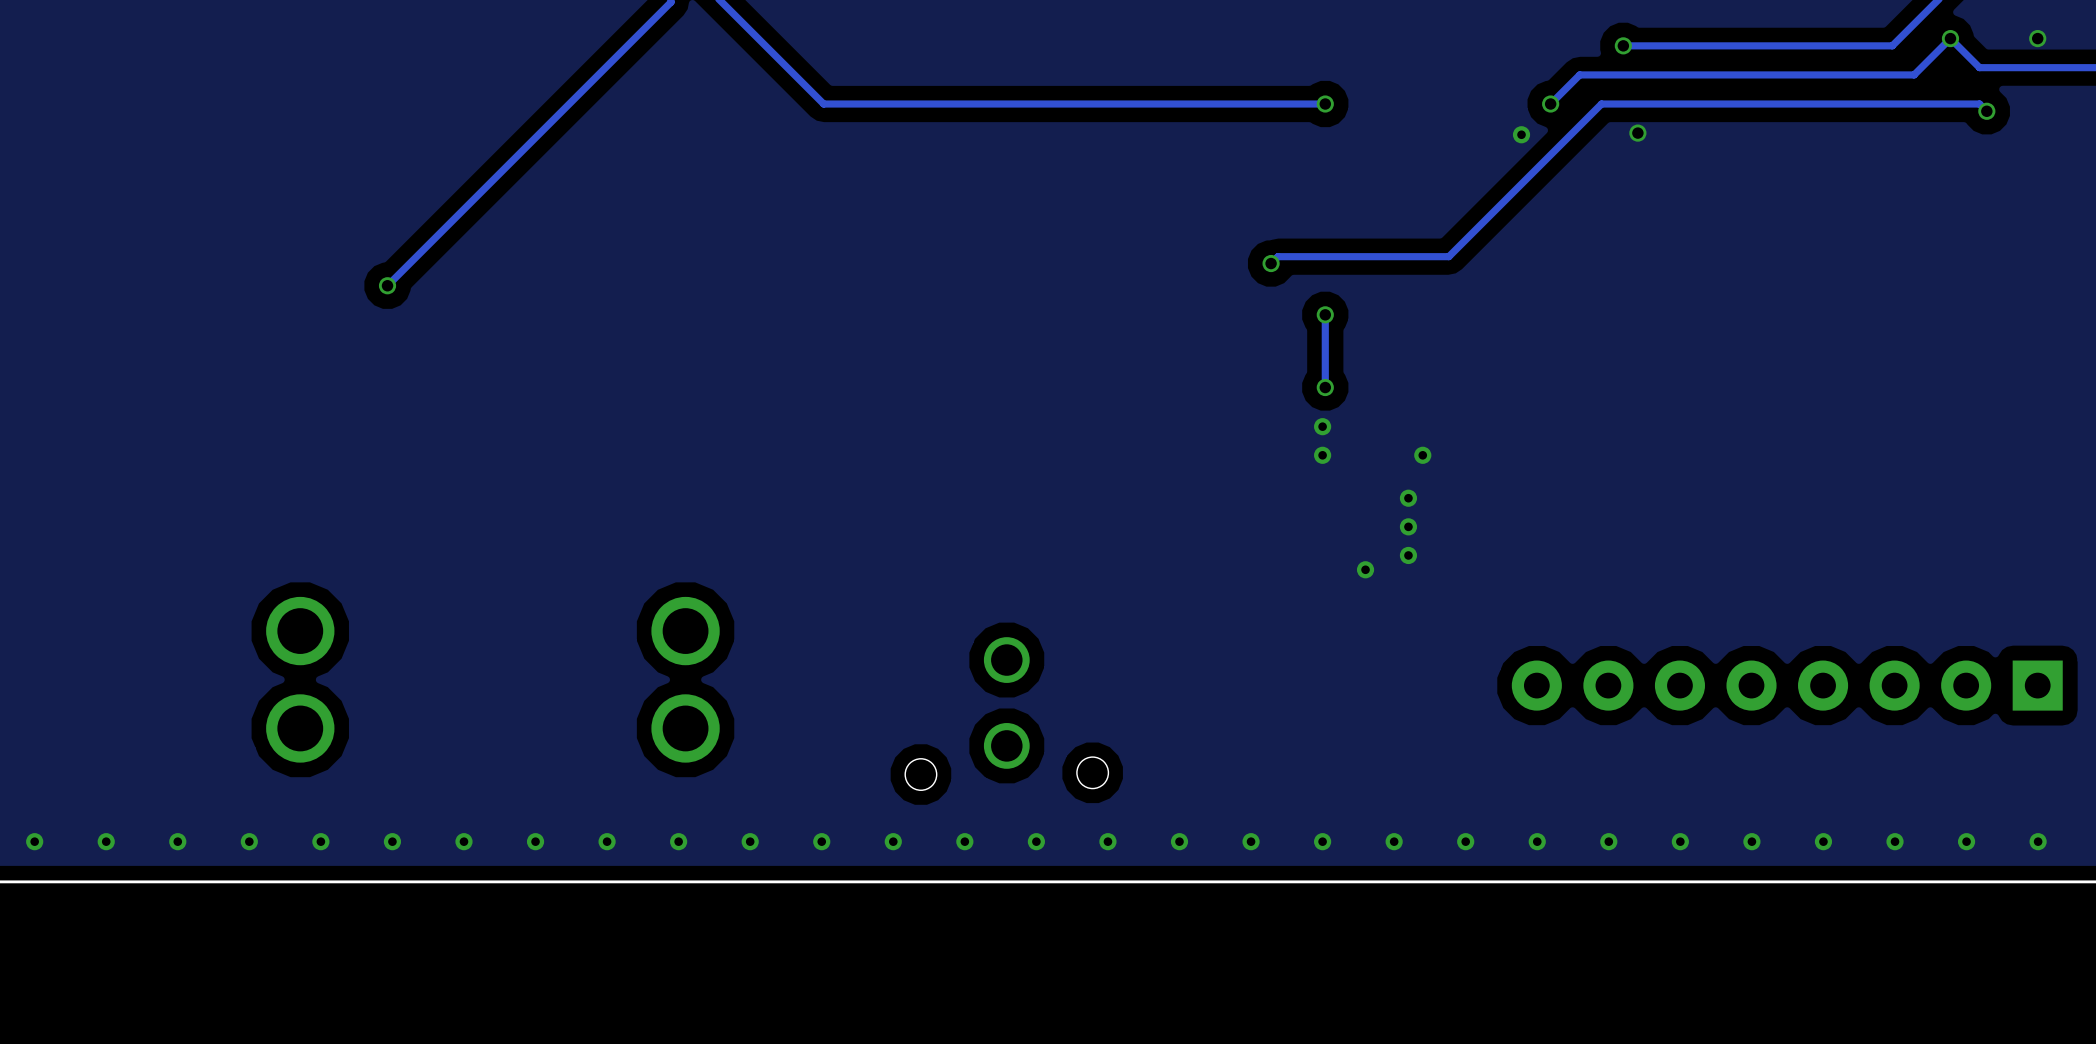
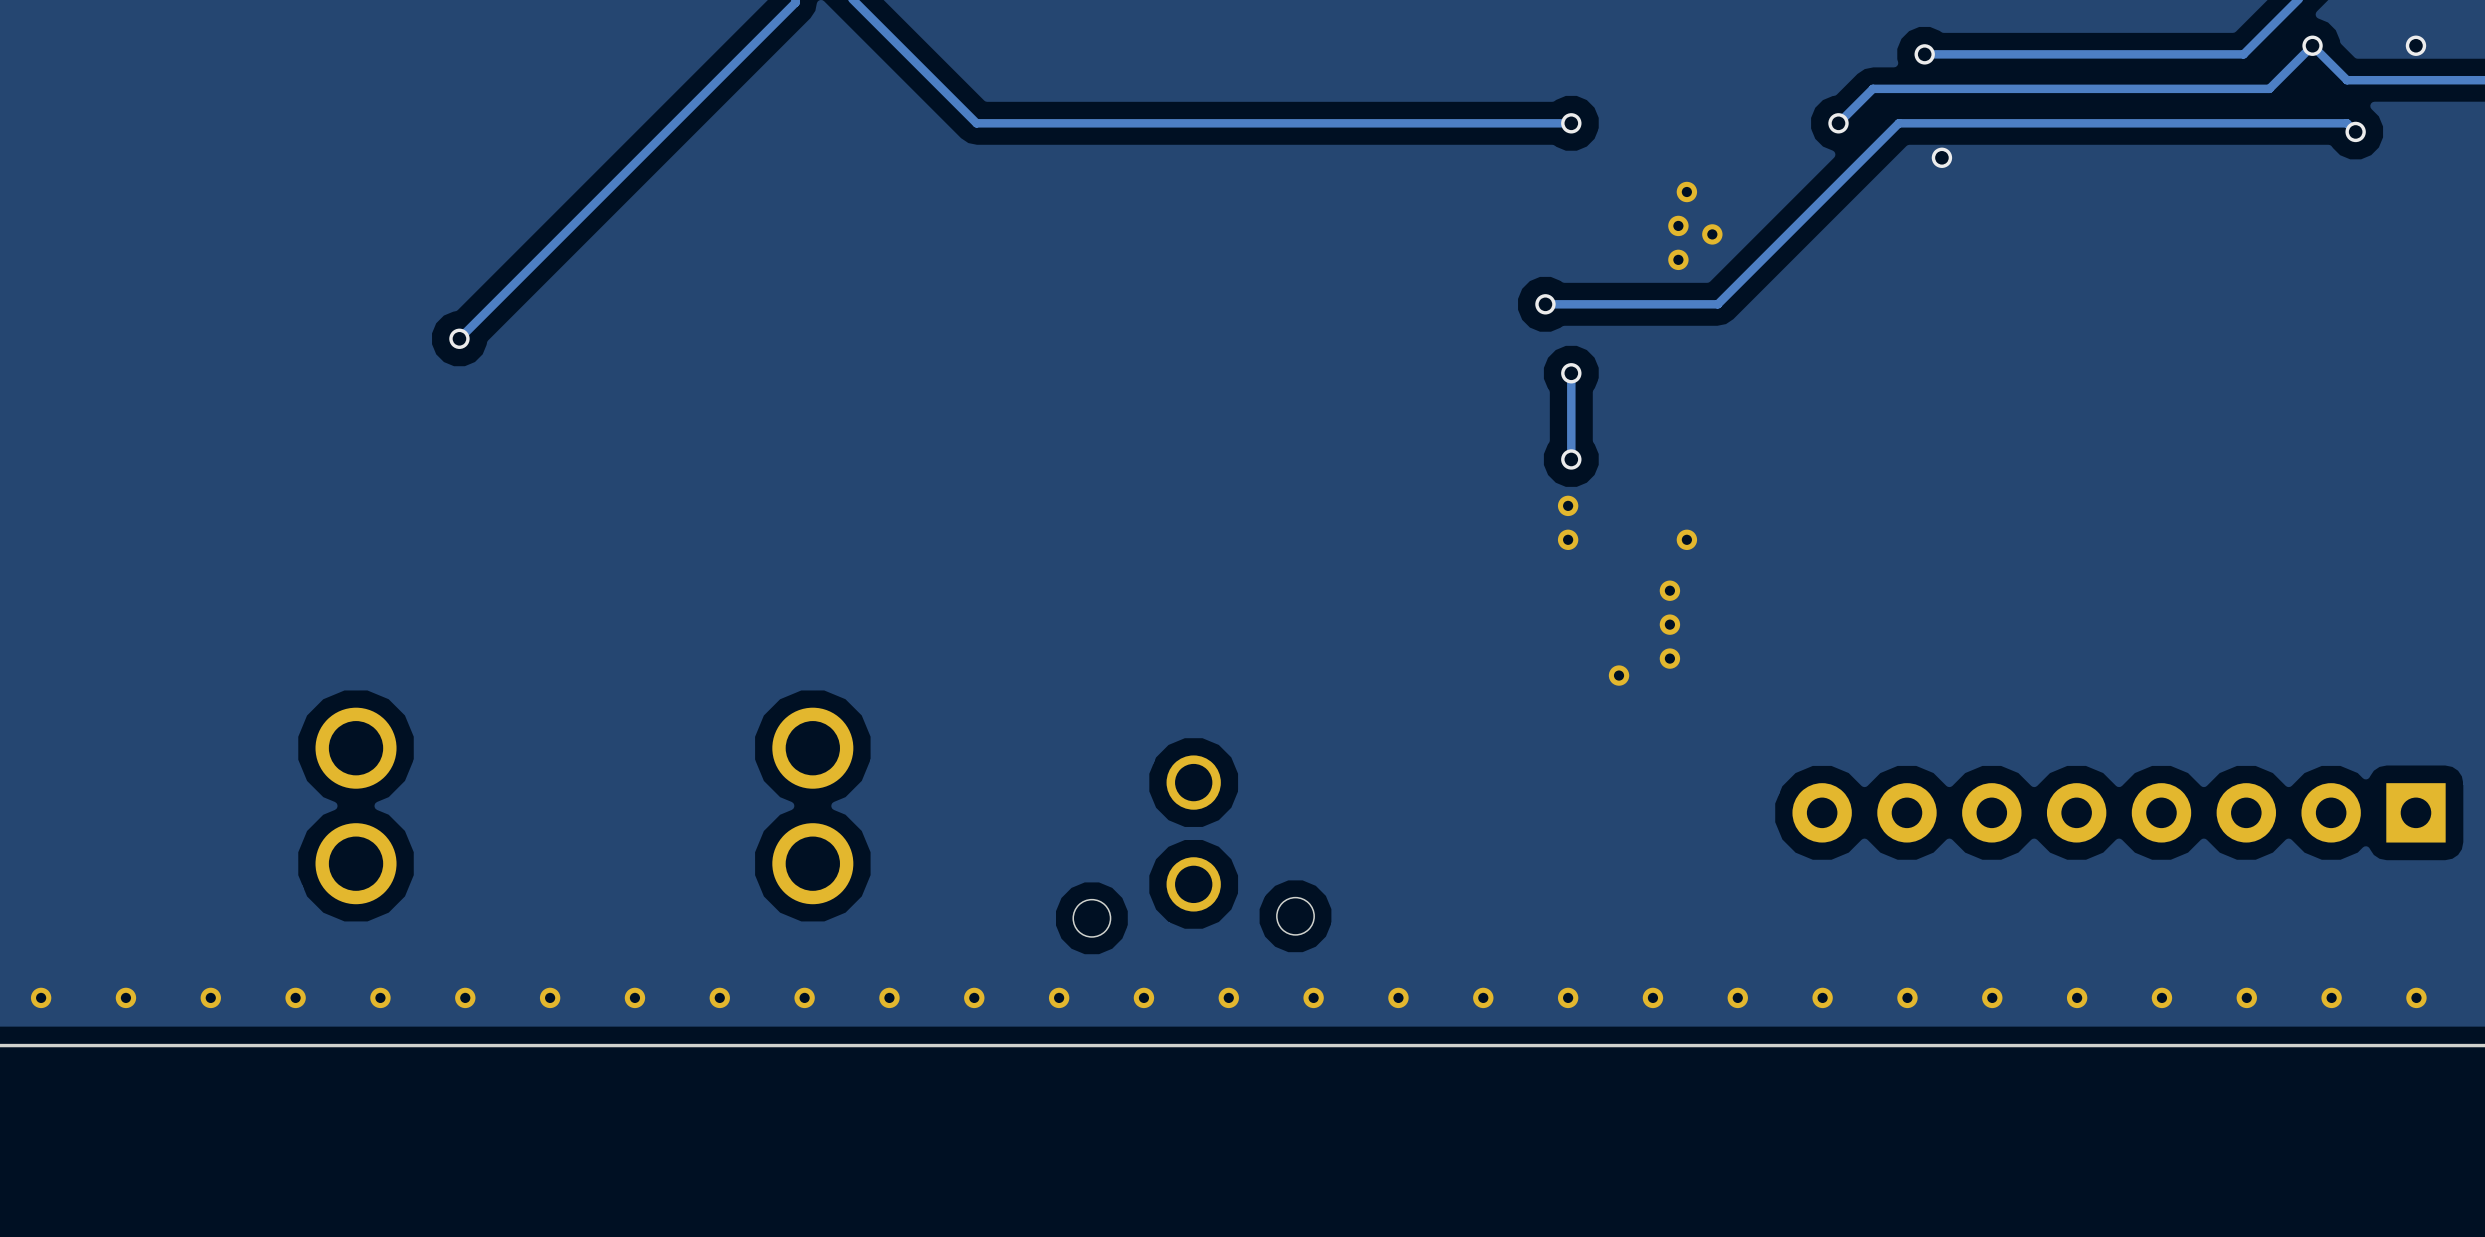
part: (1521, 134) -> none
part: none -> (1686, 192)
part: none -> (1678, 225)
part: none -> (1712, 234)
part: none -> (1678, 259)
track: (1303, 256) (1277, 256) (1271, 263) -> none
via position: (1271, 263) -> (1545, 304)

